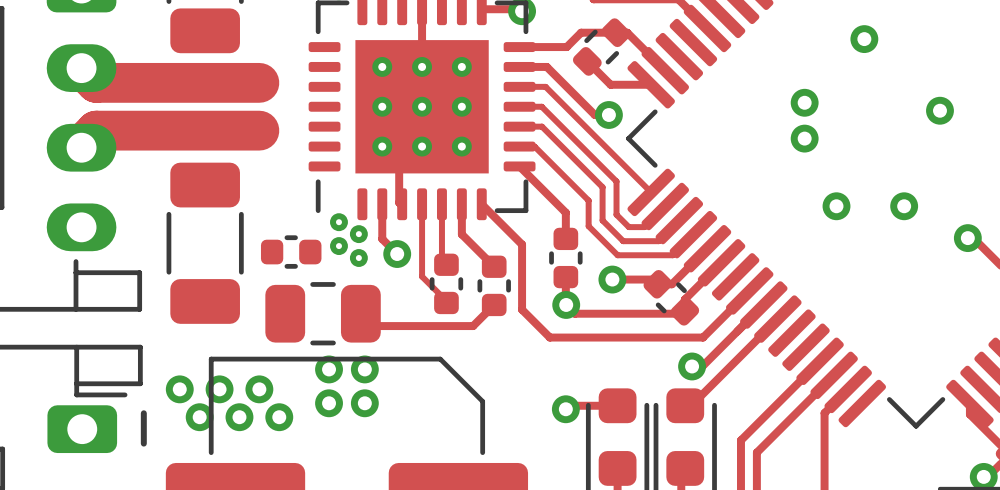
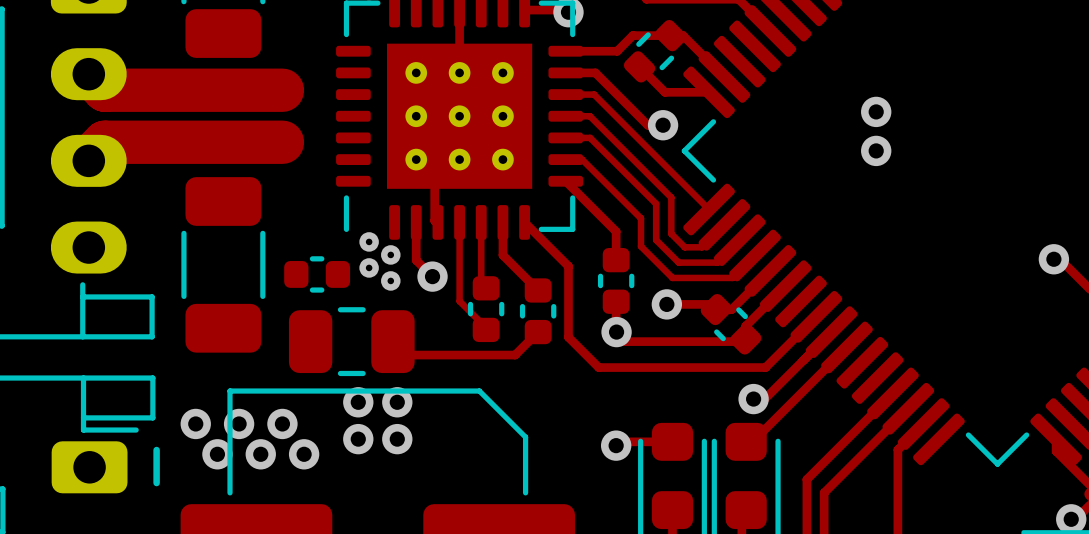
via: (864, 39) -> none
via: (939, 110) -> none
via: (836, 206) -> none
via: (904, 206) -> none

